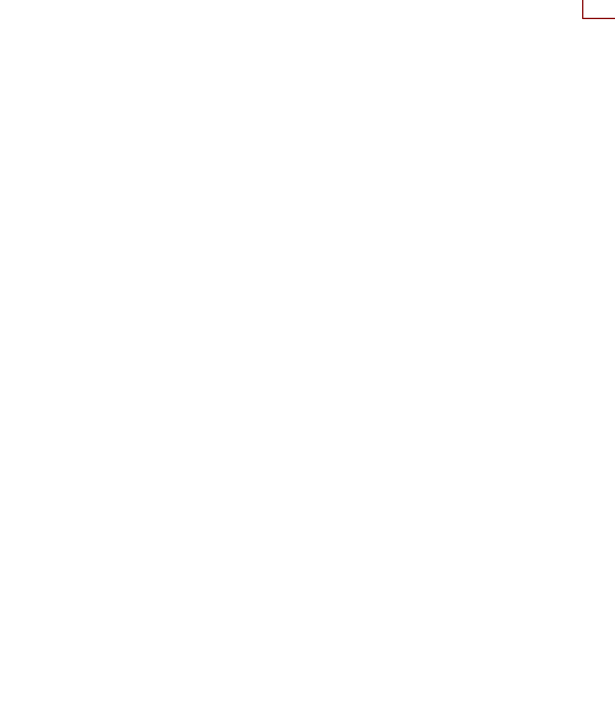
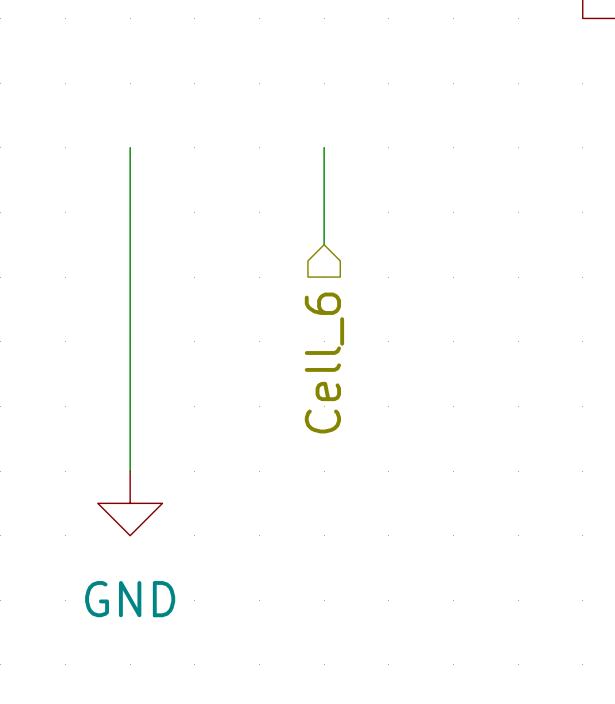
wire: none -> (130, 147) (130, 471)
wire: none -> (324, 147) (324, 244)
hierarchical label: none -> Cell_6 (324, 363)
power symbol: none -> GND (130, 503)

